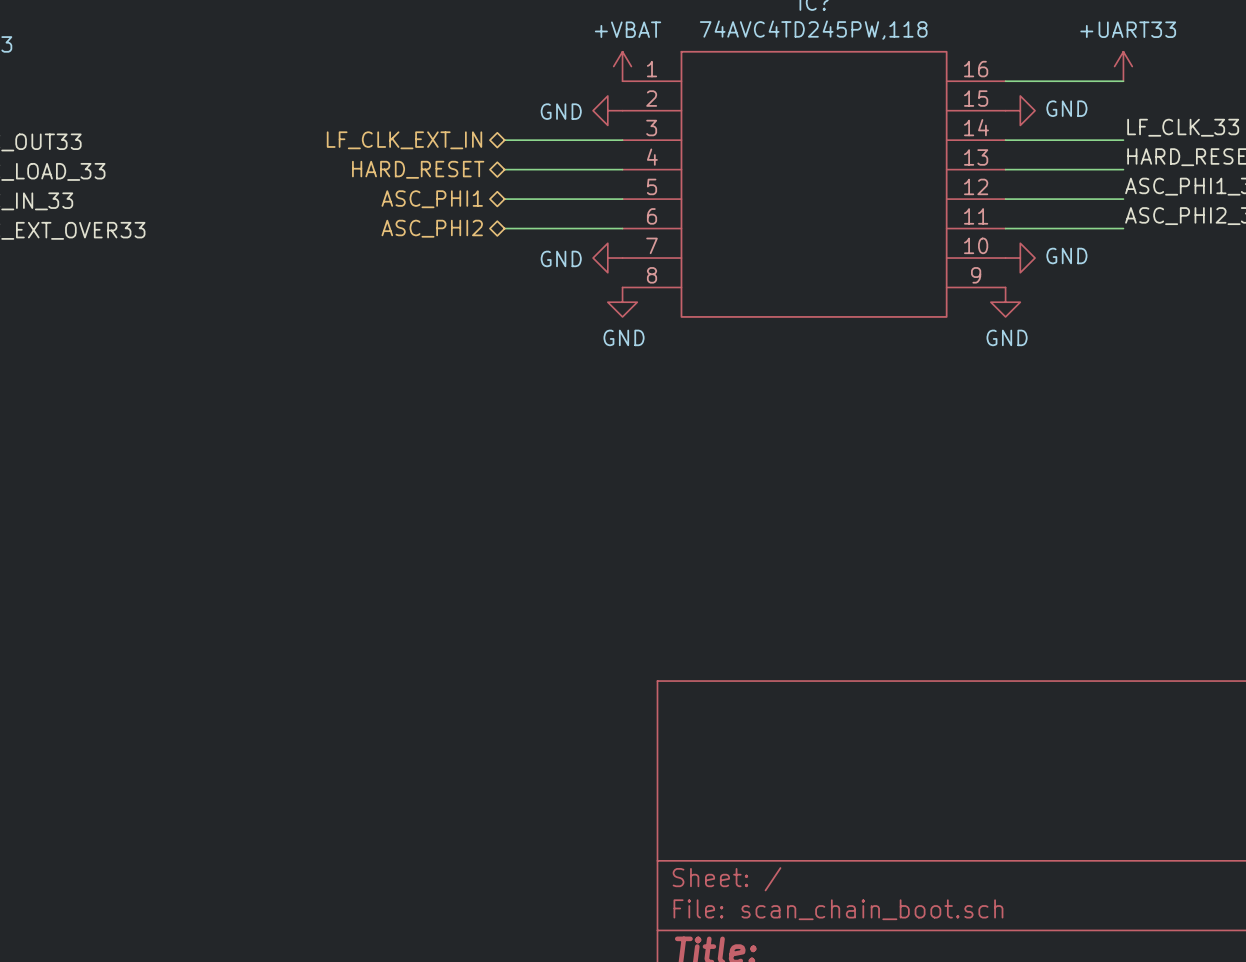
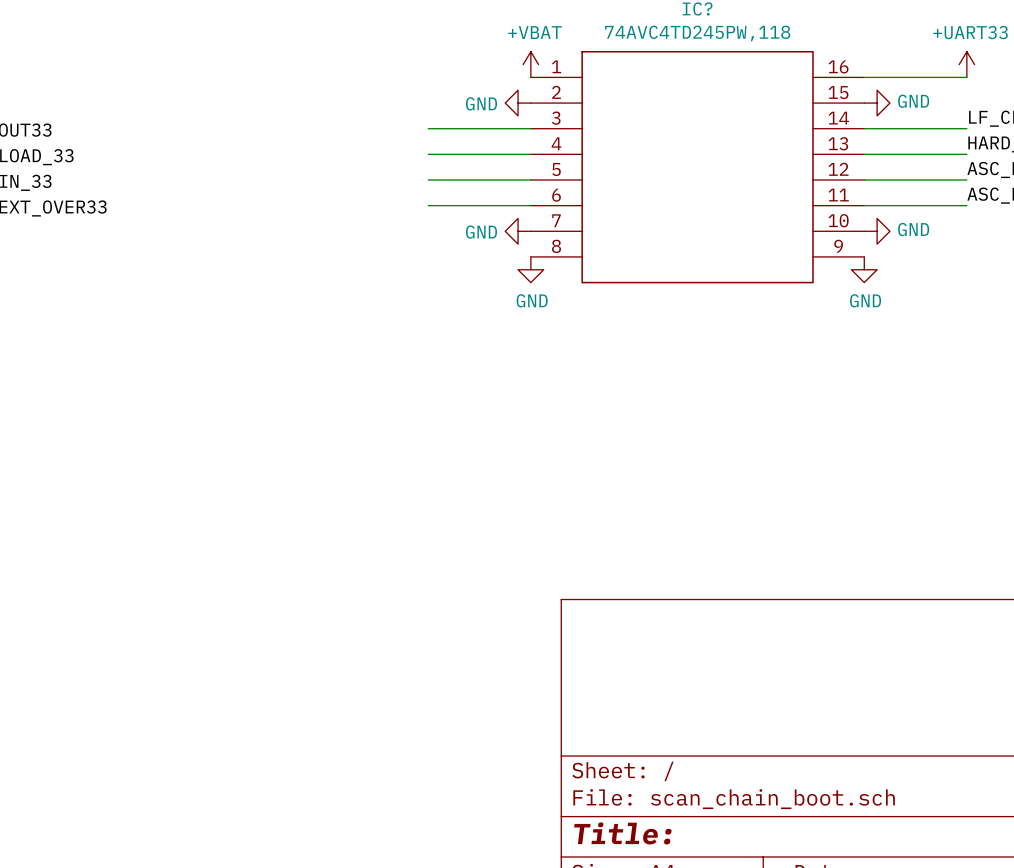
hierarchical label: LF_CLK_EXT_IN (404, 140) -> none
hierarchical label: HARD_RESET (418, 169) -> none
hierarchical label: ASC_PHI1 (432, 199) -> none
hierarchical label: ASC_PHI2 (432, 228) -> none

